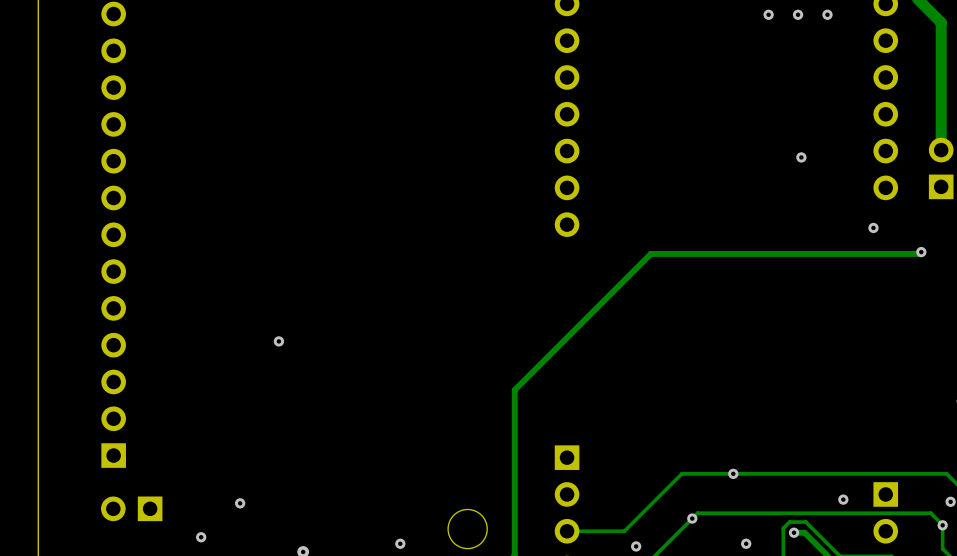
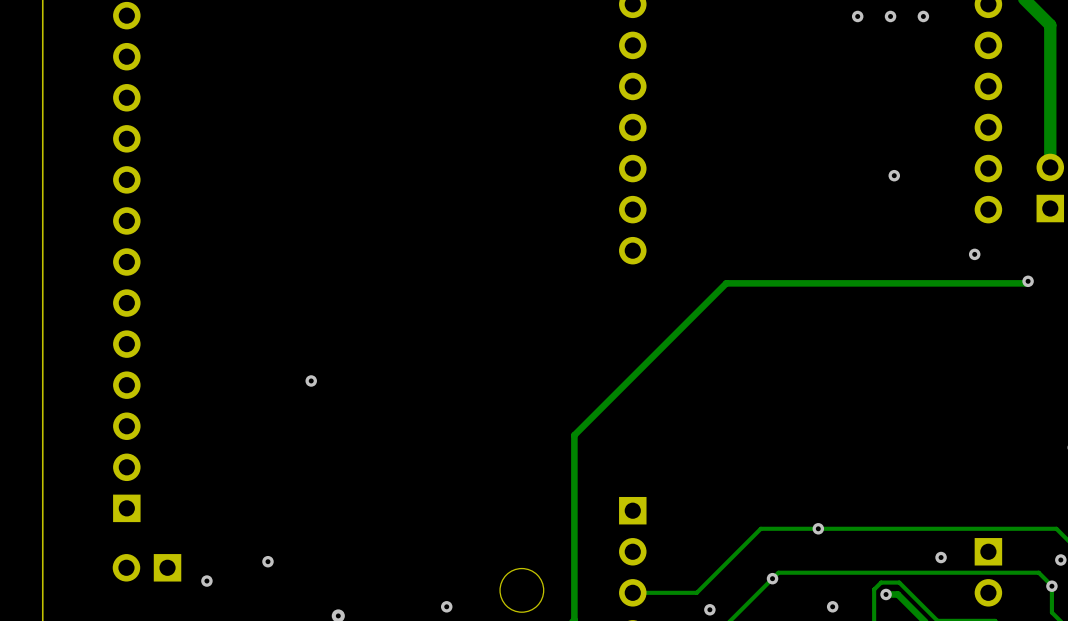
via: none -> (206, 581)
via: (201, 537) -> none

